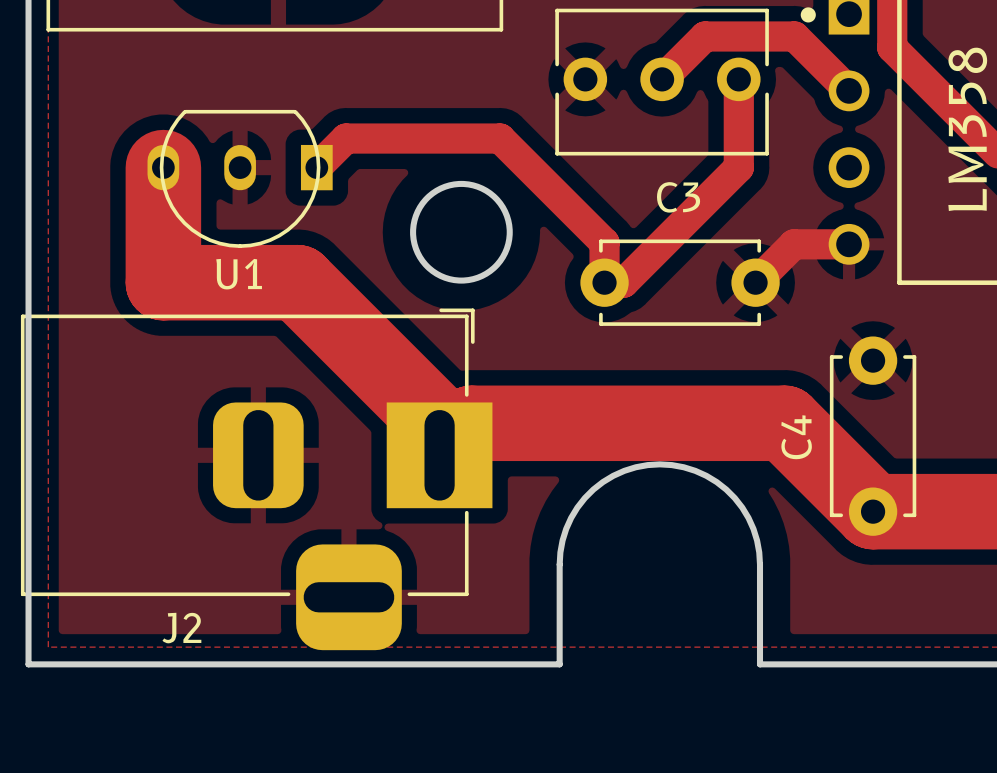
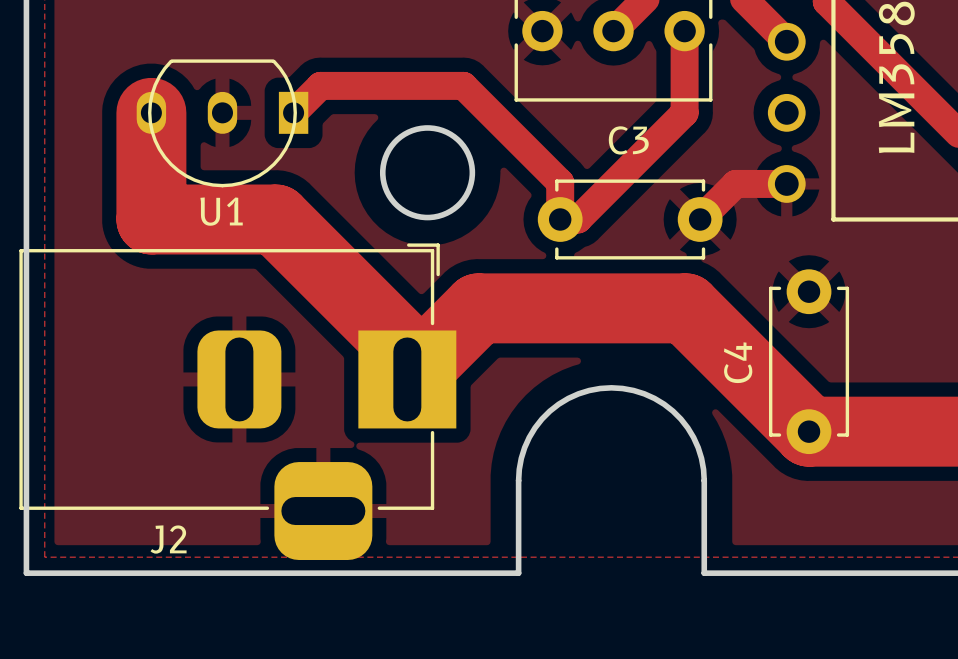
track: (471, 423) (784, 423) -> (437, 349) (478, 308) (685, 308) (727, 349)

